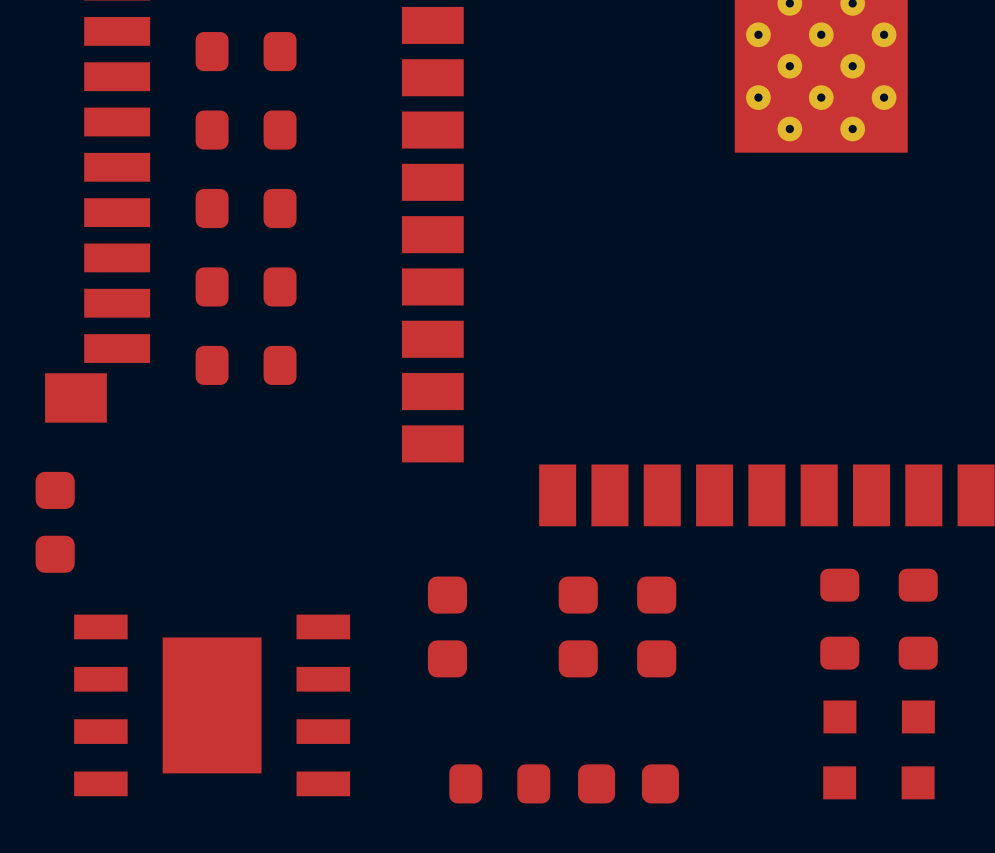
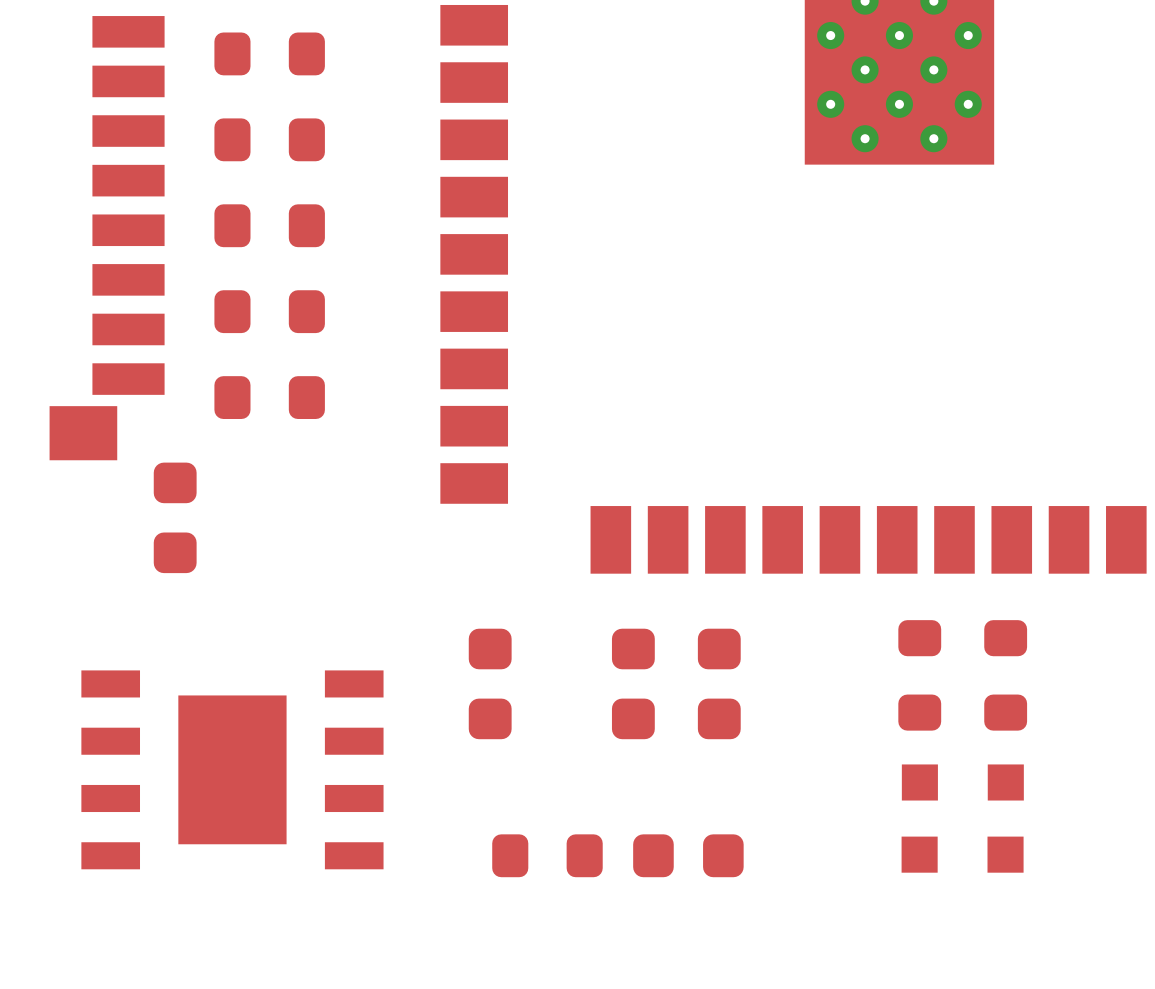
part: none -> (175, 517)
part: (55, 522) -> none

